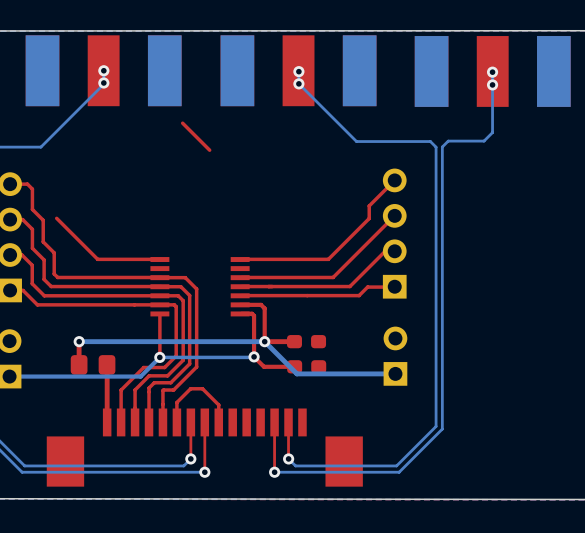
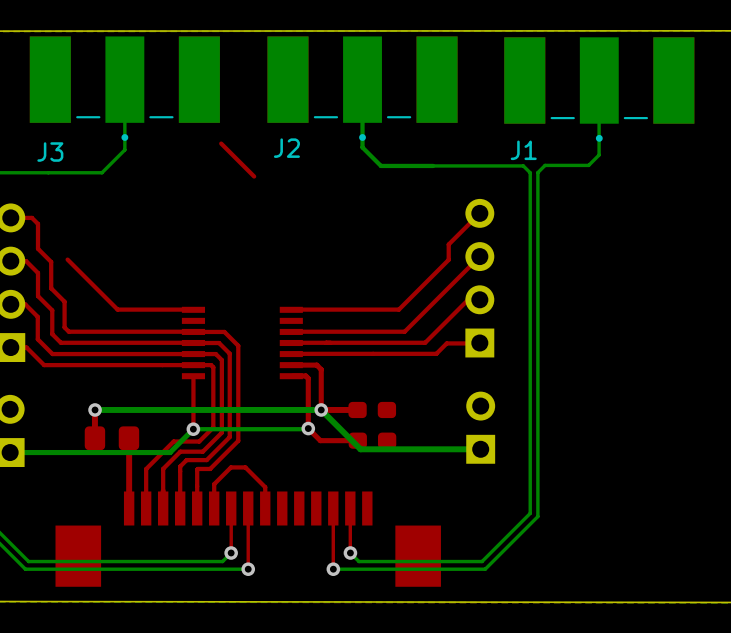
J3 side: top (103, 70) -> bottom (124, 88)
via: (103, 70) -> none
J2 side: top (298, 70) -> bottom (362, 88)
via: (298, 71) -> none
J1 side: top (492, 71) -> bottom (599, 89)
via: (492, 72) -> none
via: (103, 82) -> none
bottom track: (298, 83) (356, 141) -> (362, 79) (362, 147) (380, 165) (433, 165)
via: (298, 83) -> none
bottom track: (103, 84) (40, 147) -> (124, 79) (124, 149) (102, 172) (48, 172)
via: (492, 84) -> none

